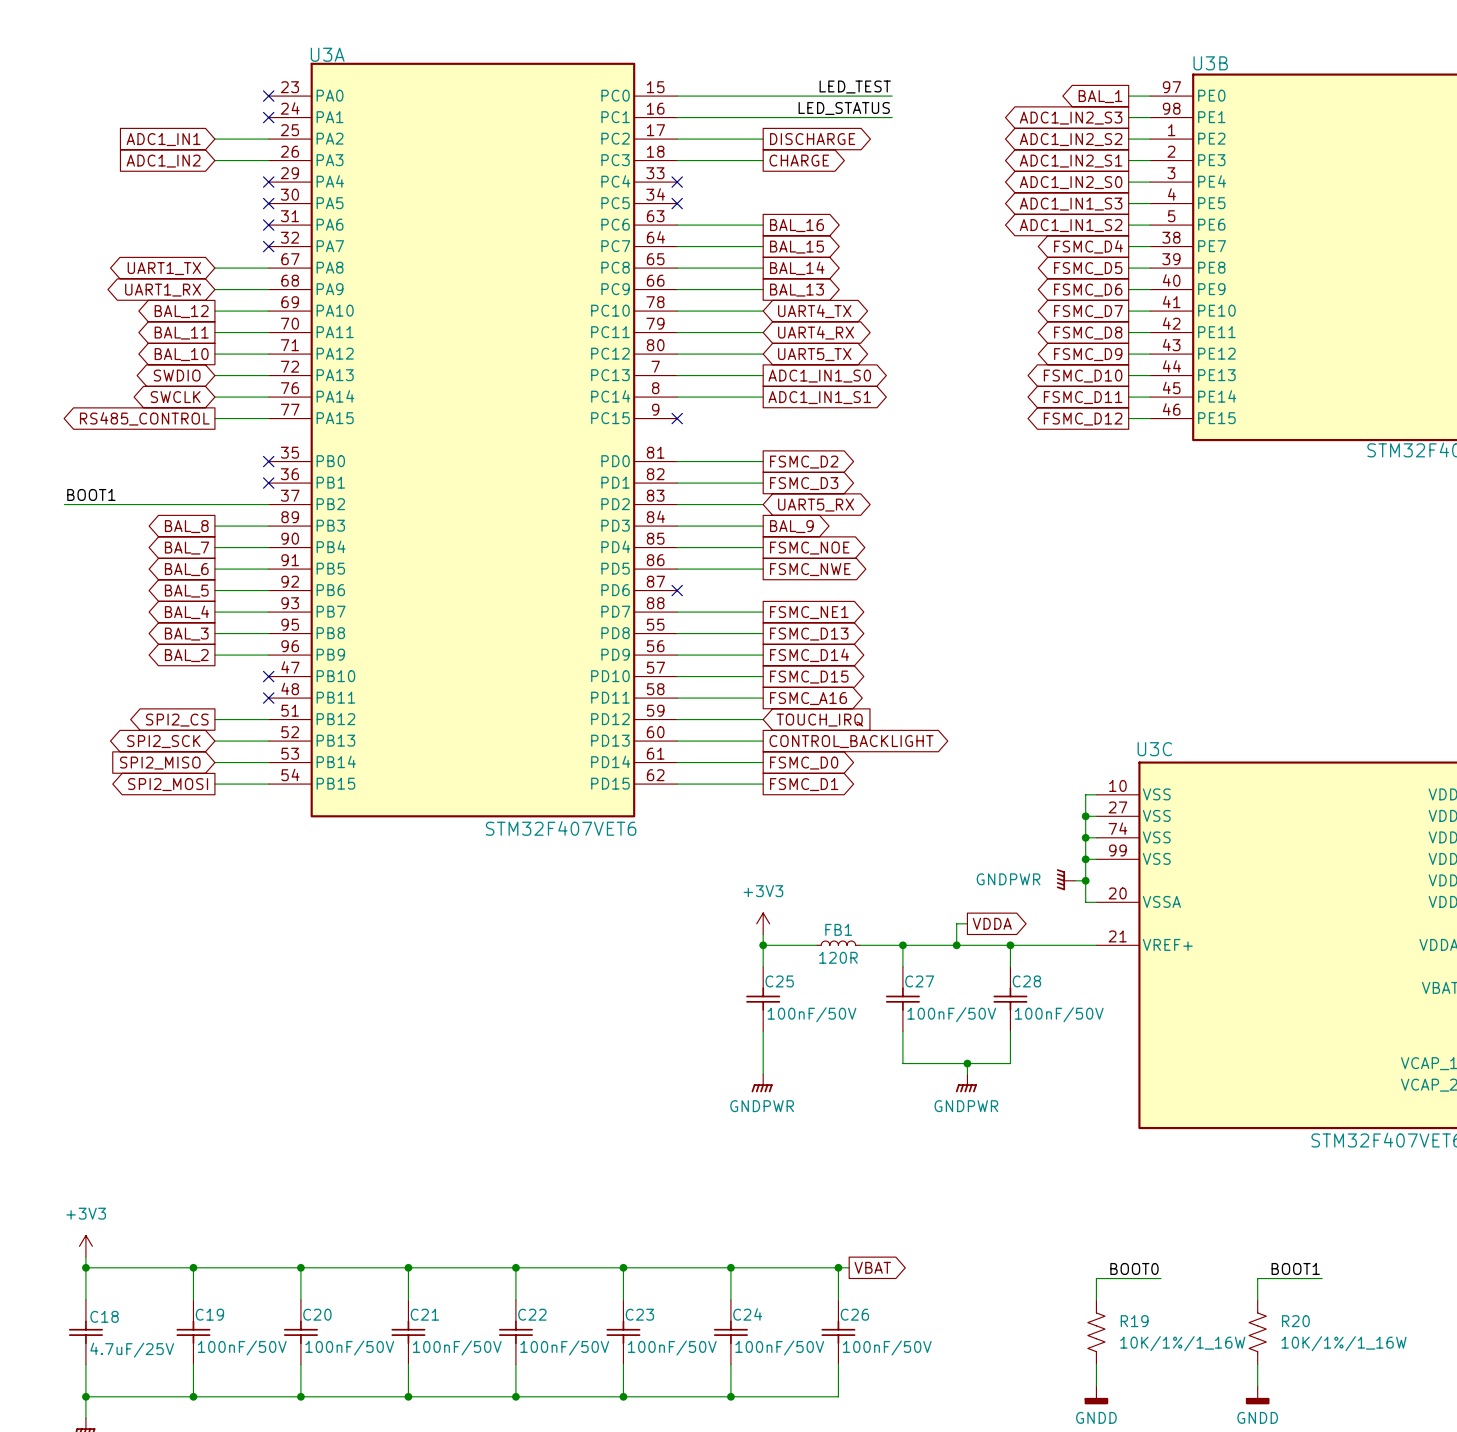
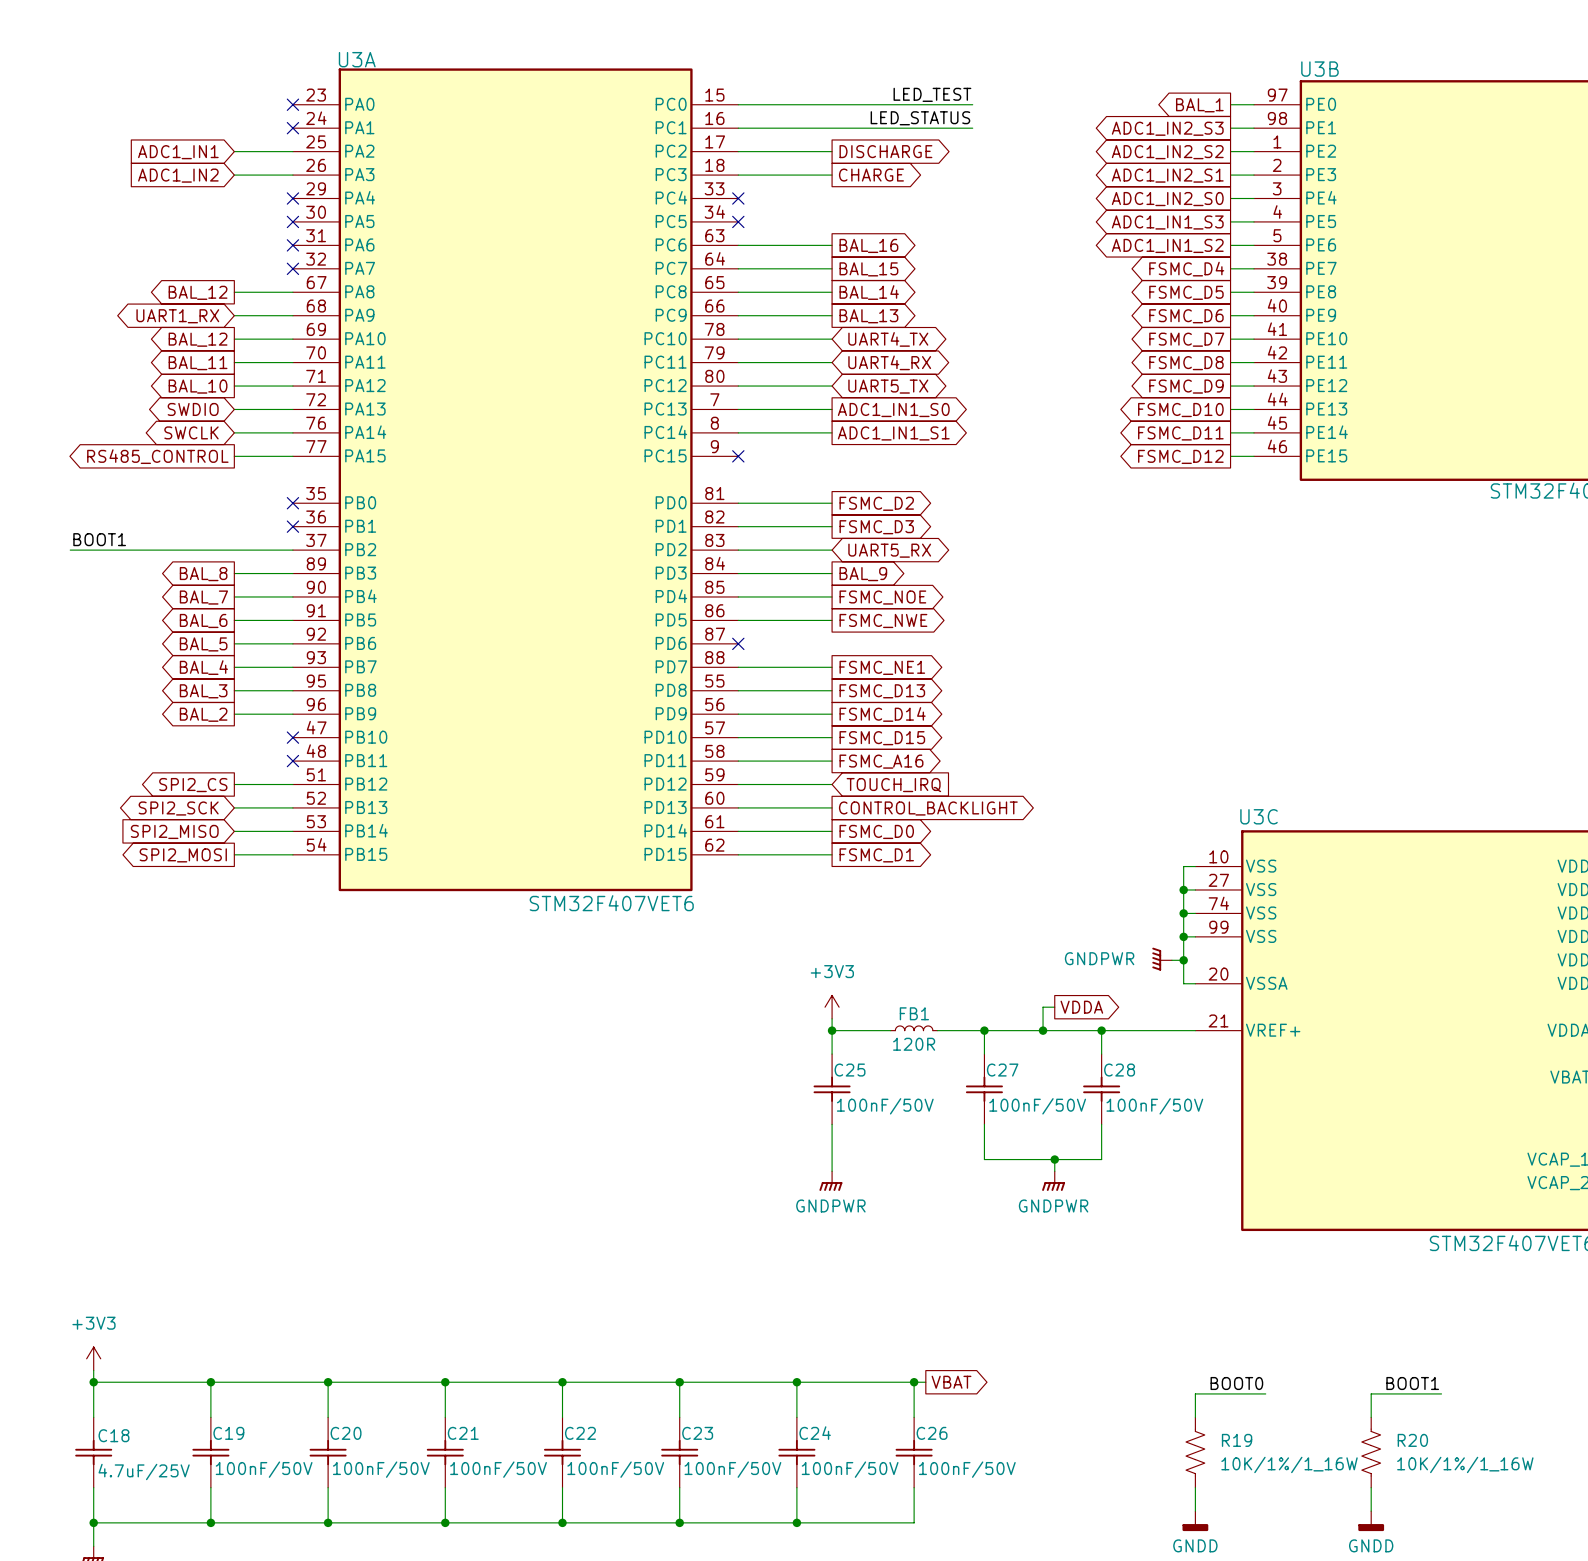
global label shape: bidirectional (164, 268) -> output (198, 292)
global label: UART1_TX (164, 268) -> BAL_12 (198, 292)

